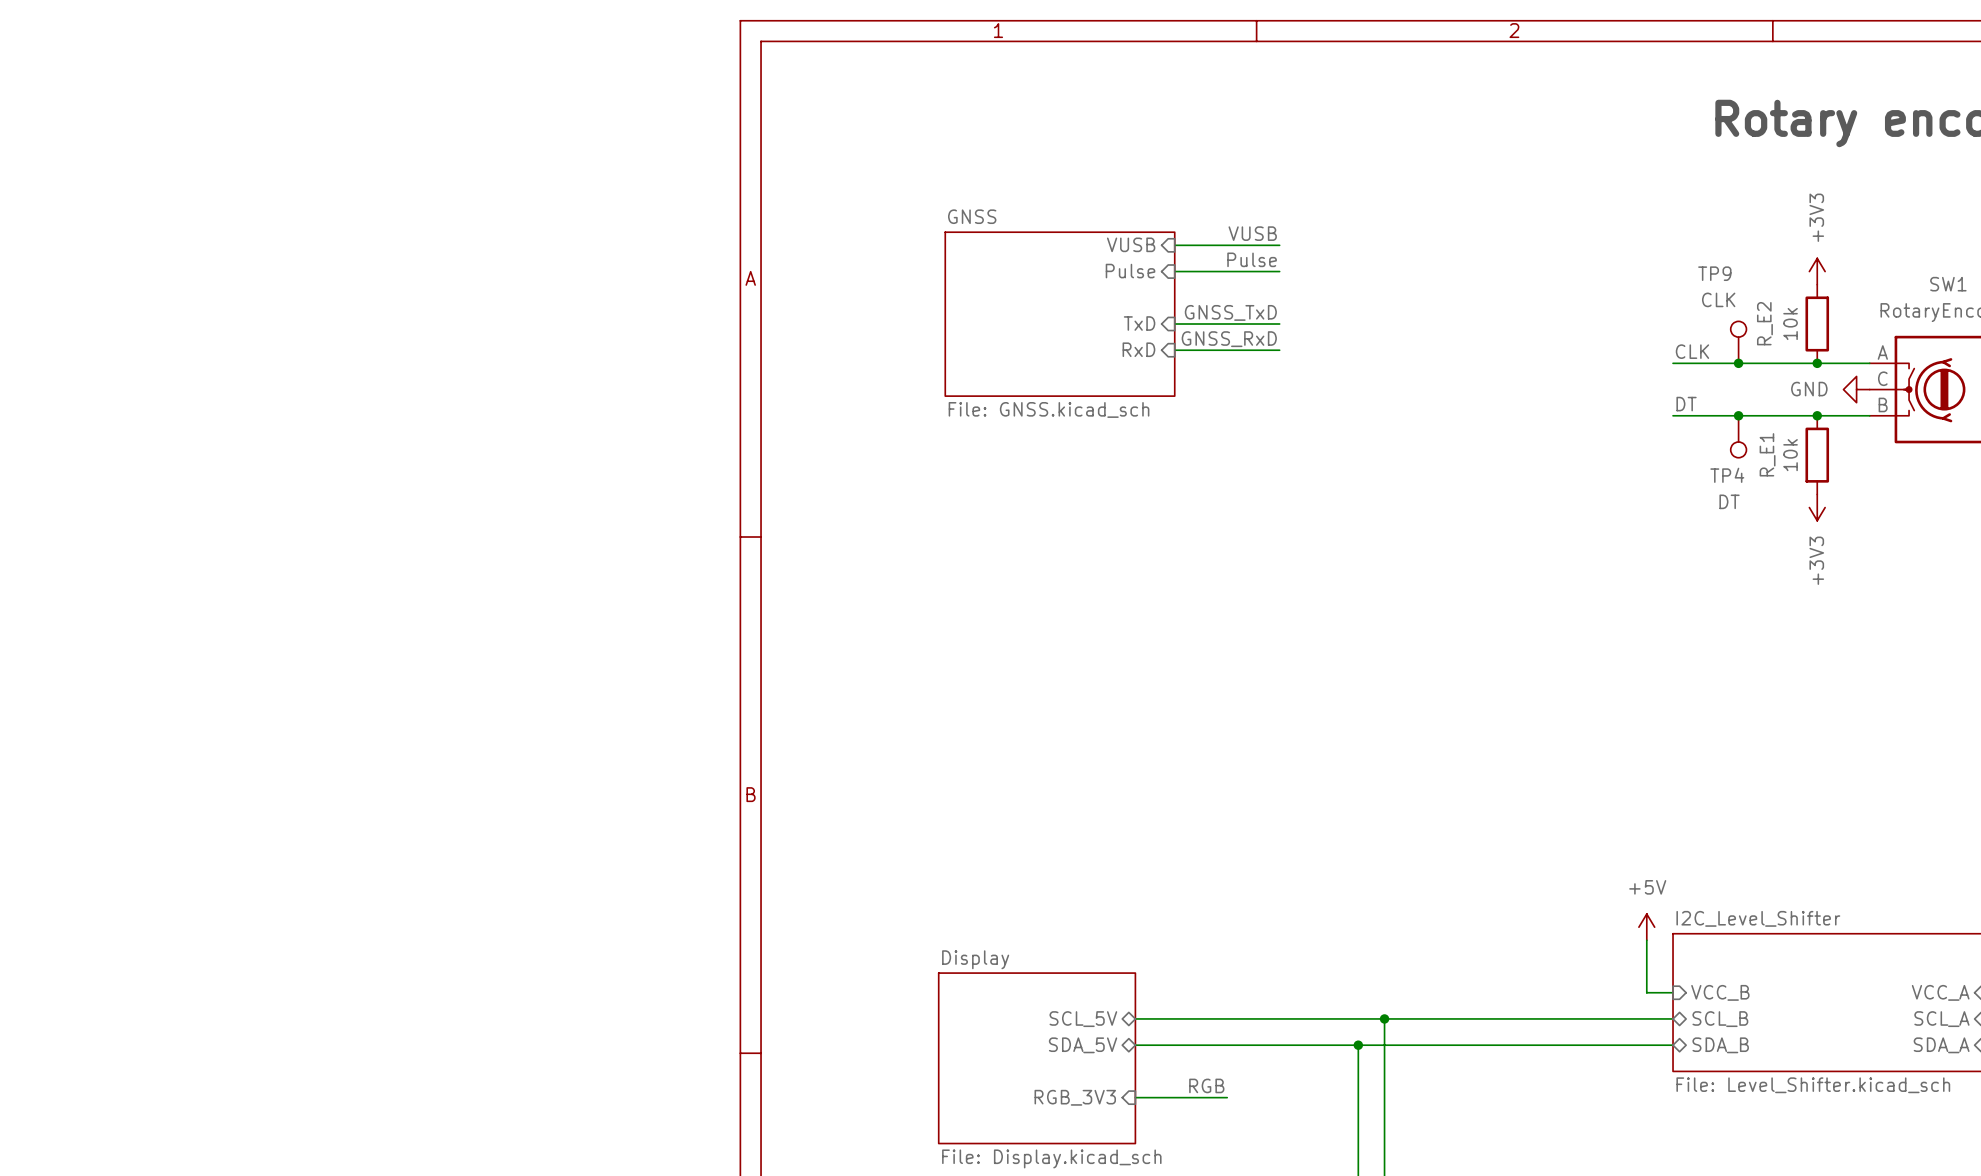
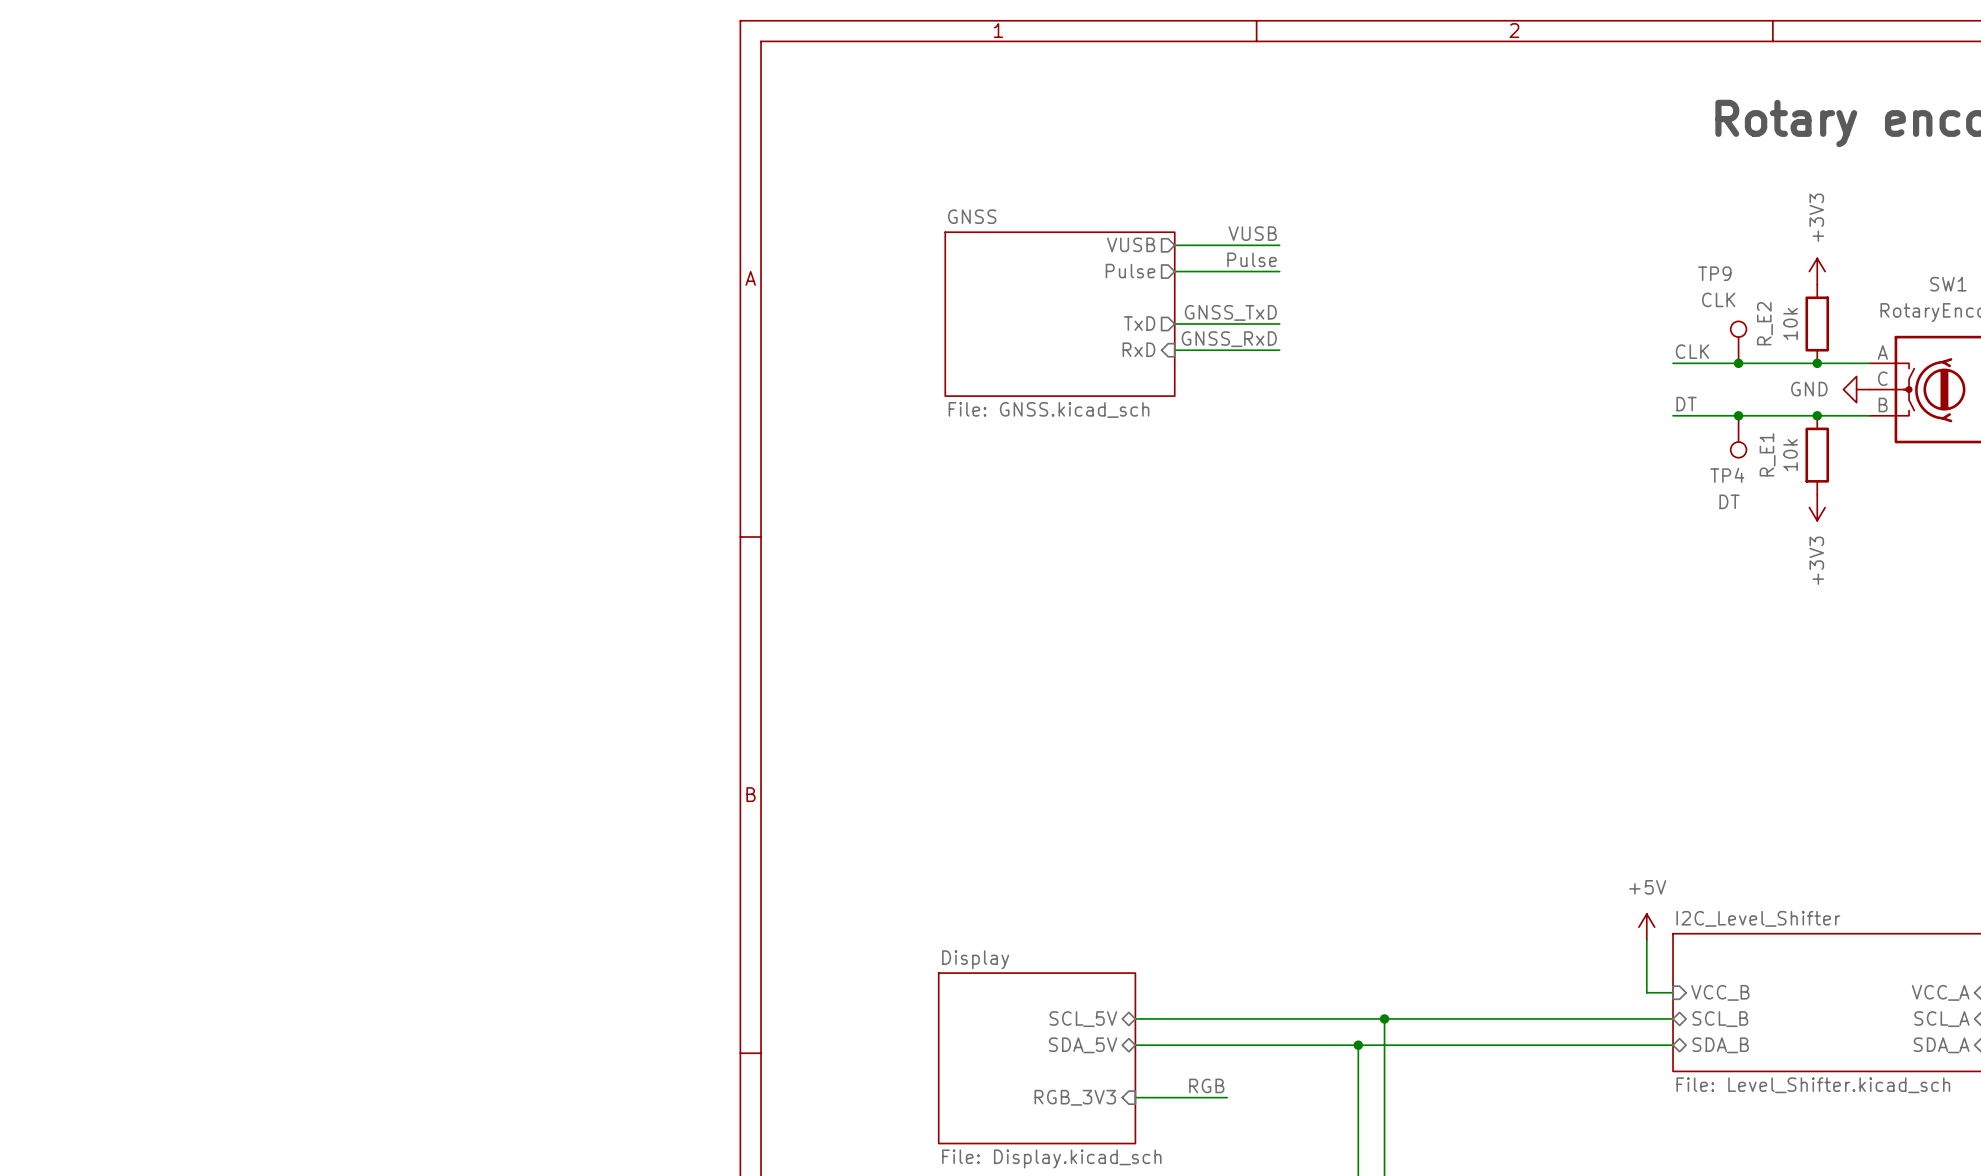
sheet pin shape: input (1131, 244) -> output (1131, 244)
sheet pin shape: input (1130, 271) -> output (1130, 271)
sheet pin shape: input (1139, 323) -> output (1139, 323)

